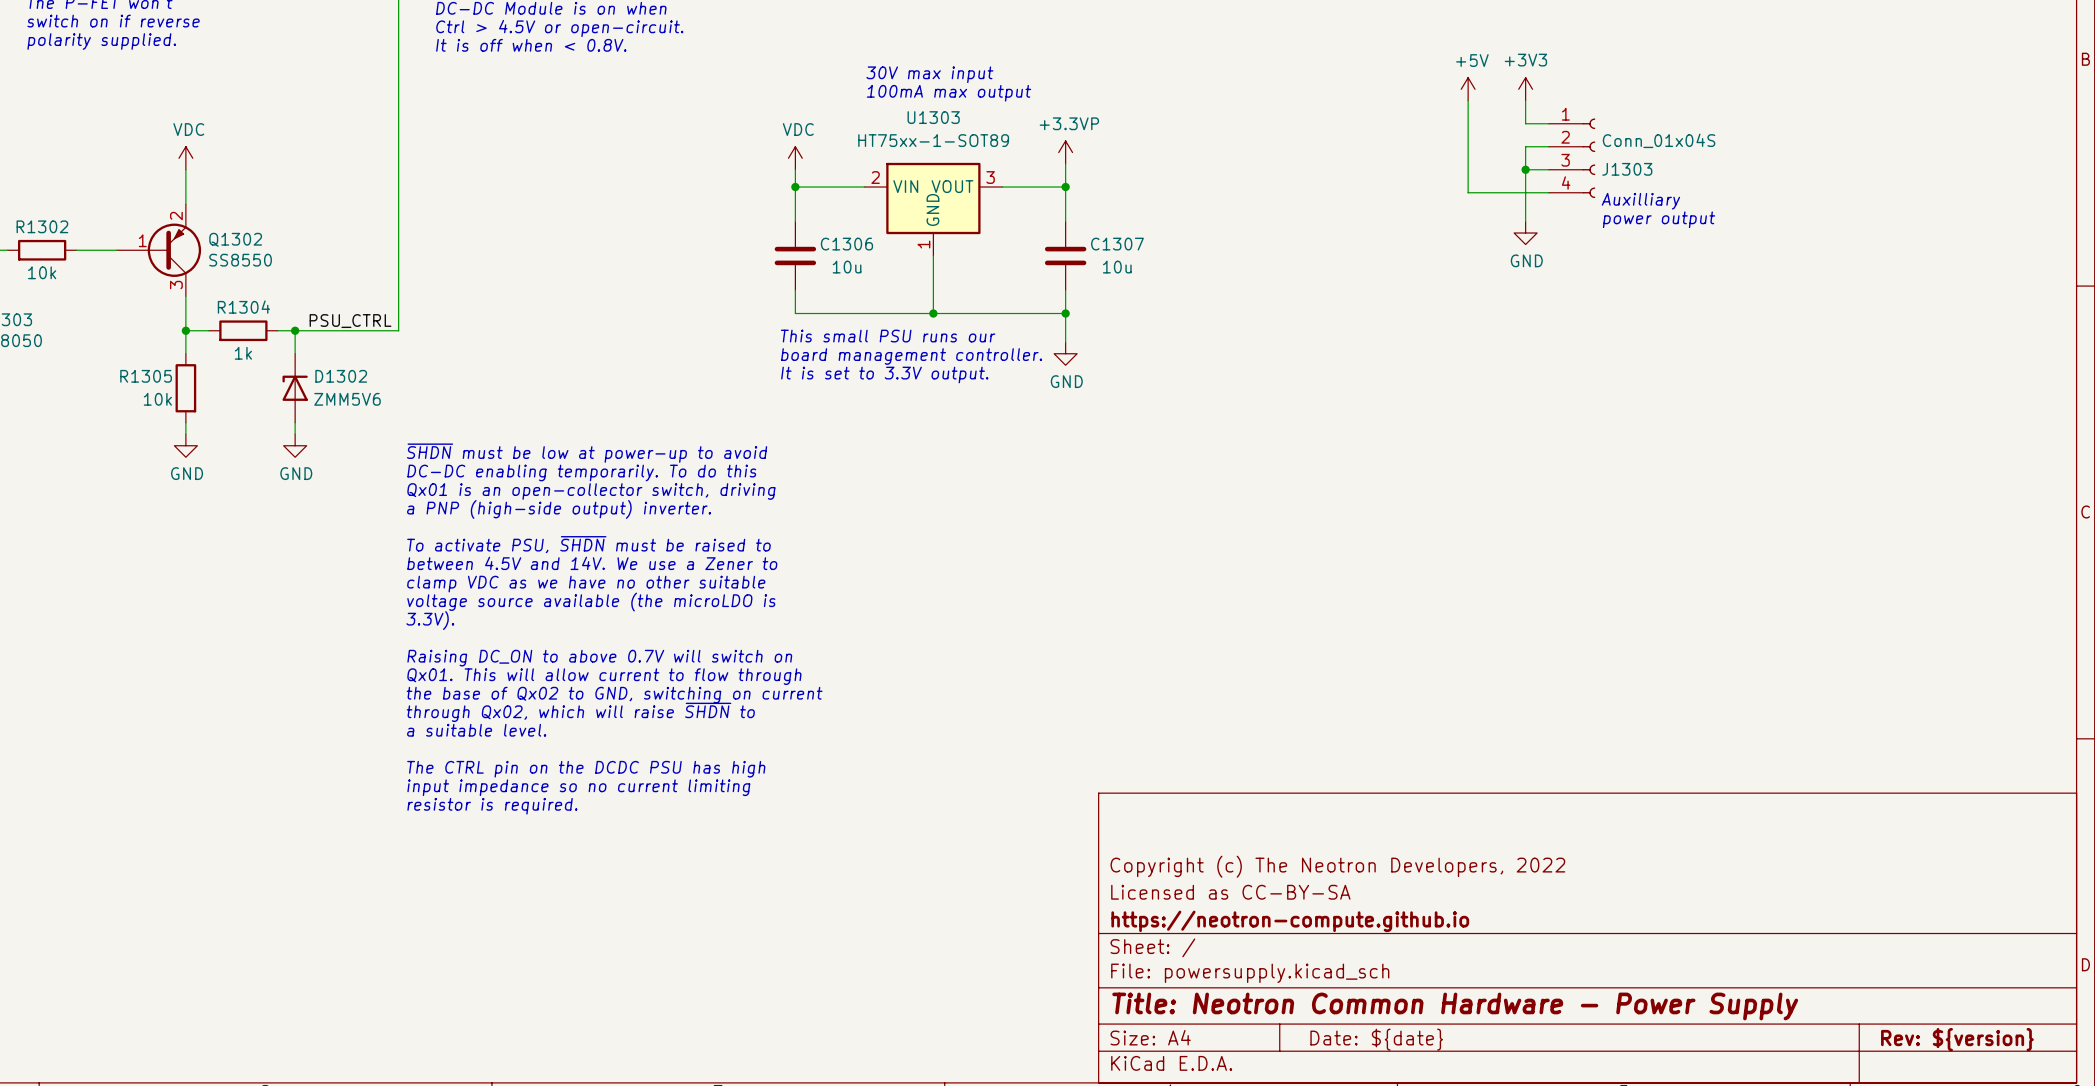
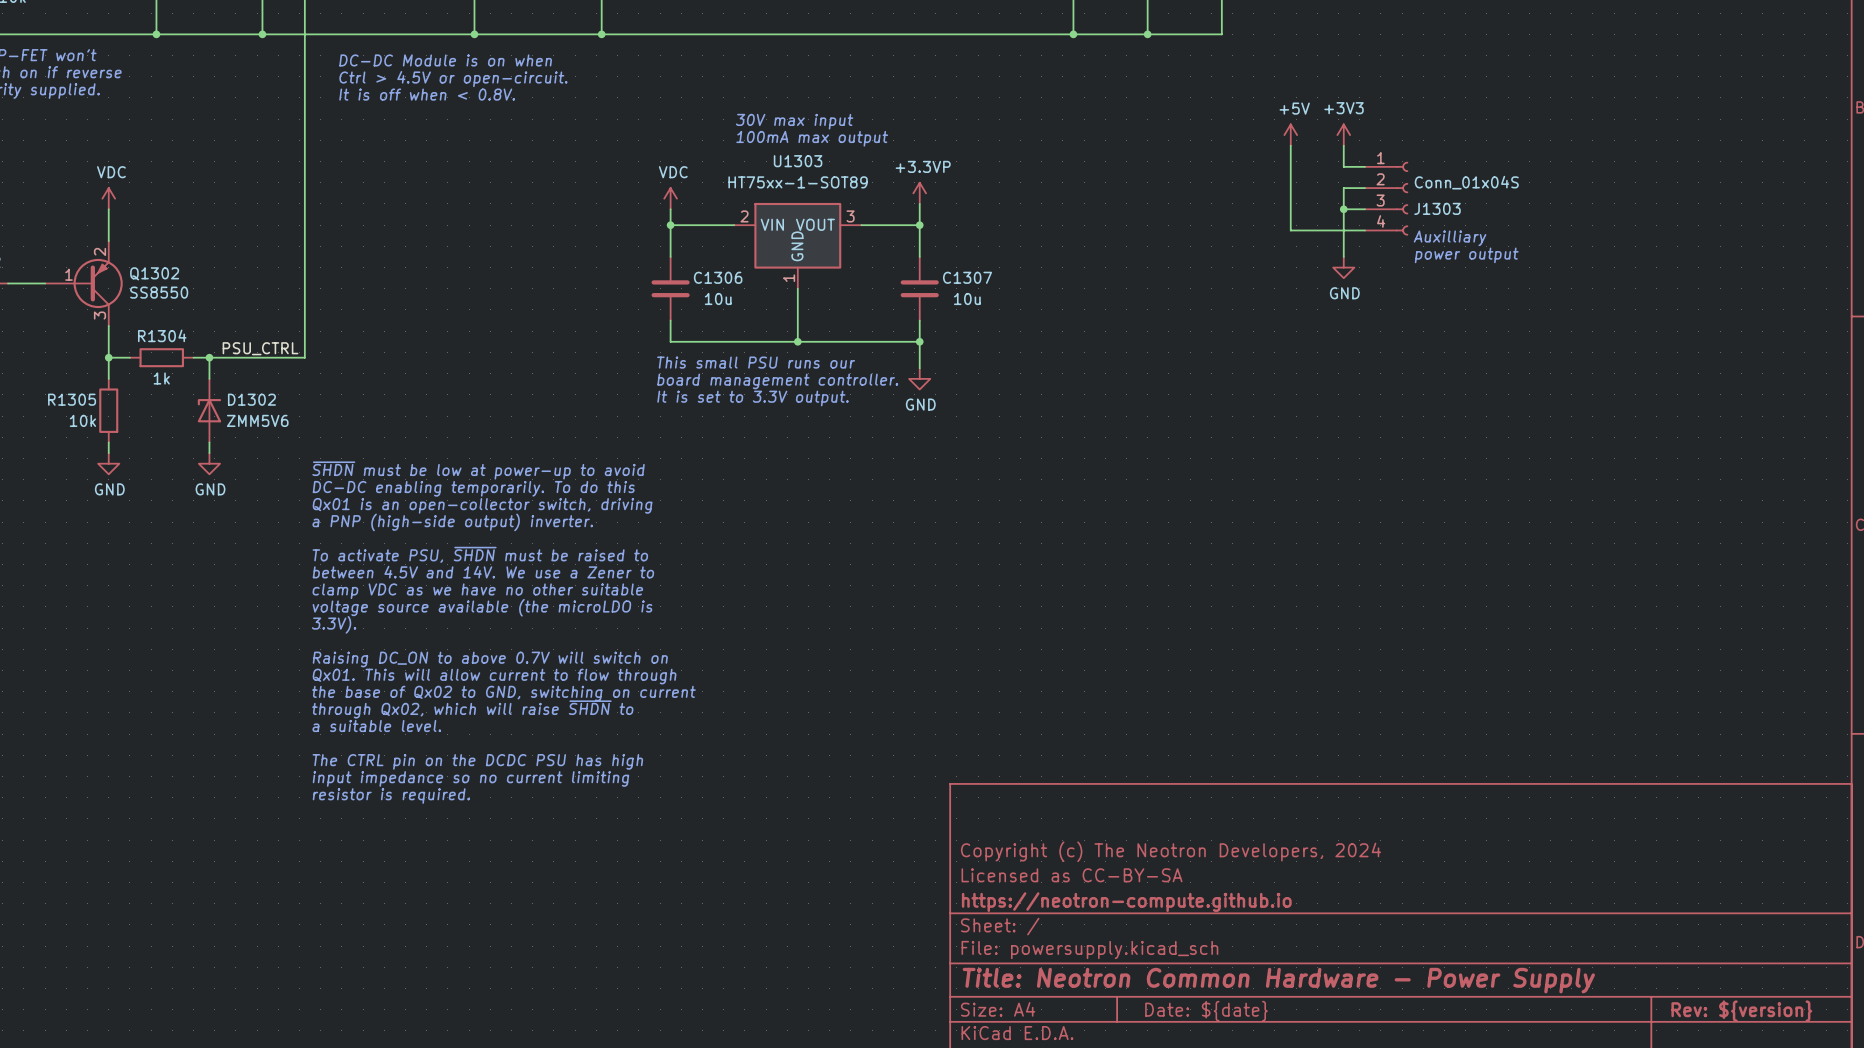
title block: Copyright (c) The Neotron Developers, 2022 (1337, 866) -> Copyright (c) The Neotron Developers, 2024 (1171, 851)

